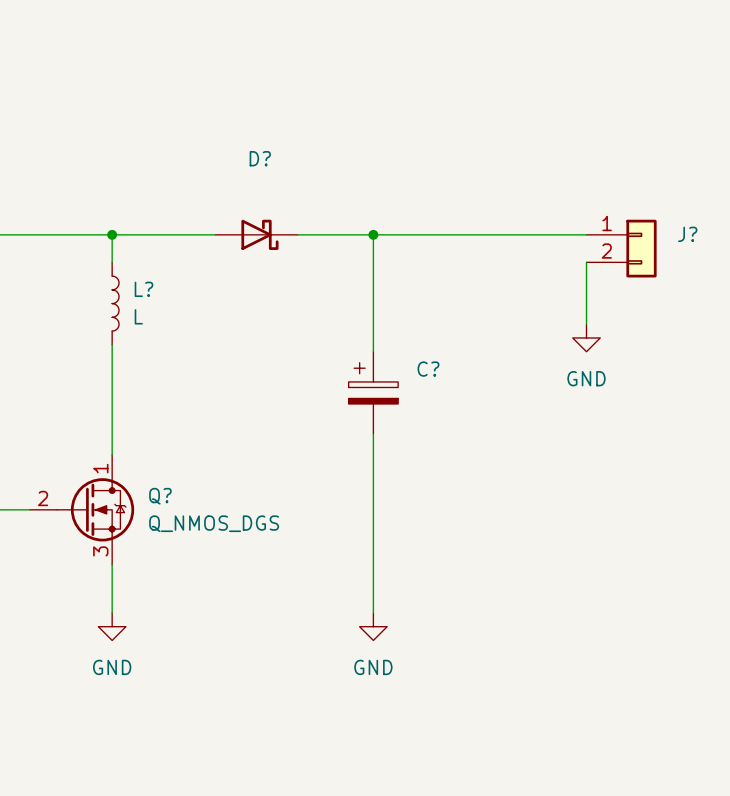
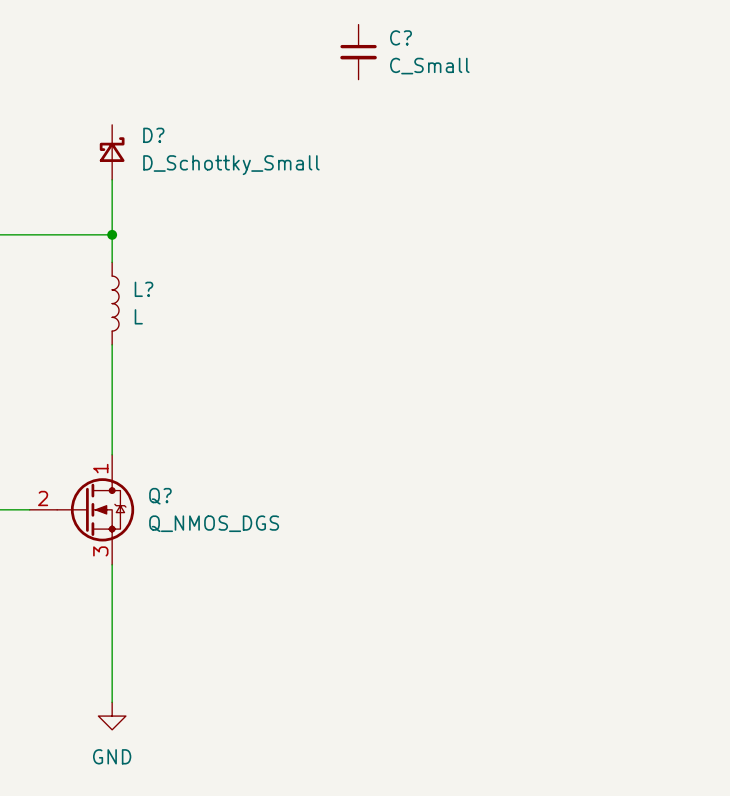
C?: none -> C_Small (358, 52)
D?: none -> D_Schottky_Small (112, 152)
wire: (112, 234) (215, 234) -> (112, 234) (112, 179)
D?: (256, 234) -> none
wire: (297, 234) (586, 234) -> none
wire: (373, 234) (373, 351) -> none
junction: (373, 234) -> none
J?: (621, 248) -> none
wire: (586, 262) (586, 324) -> none
power symbol: GND (586, 337) -> none
C?: (373, 392) -> none
wire: (373, 434) (373, 612) -> none
wire: none -> (112, 612) (112, 702)
power symbol position: GND (112, 626) -> GND (112, 716)
power symbol: GND (373, 626) -> none

